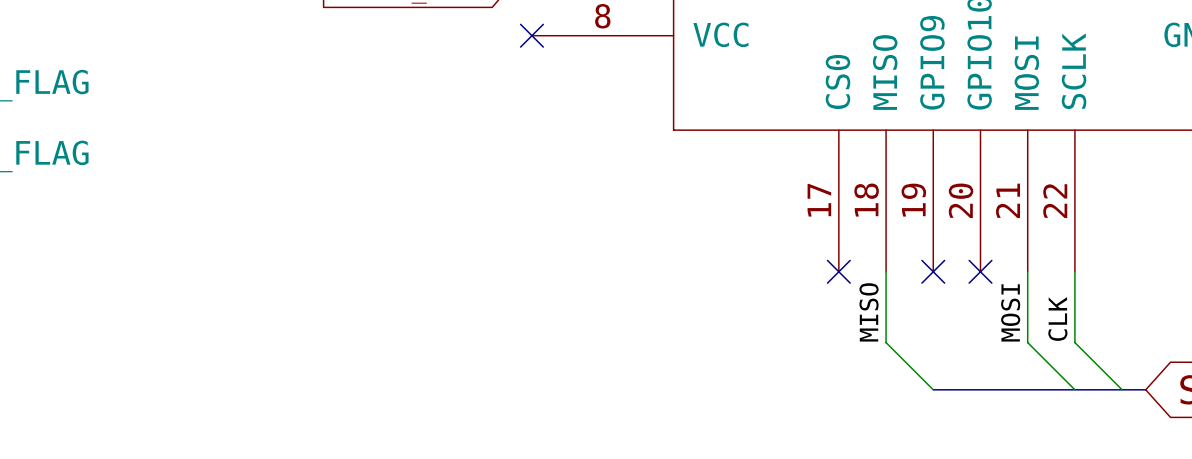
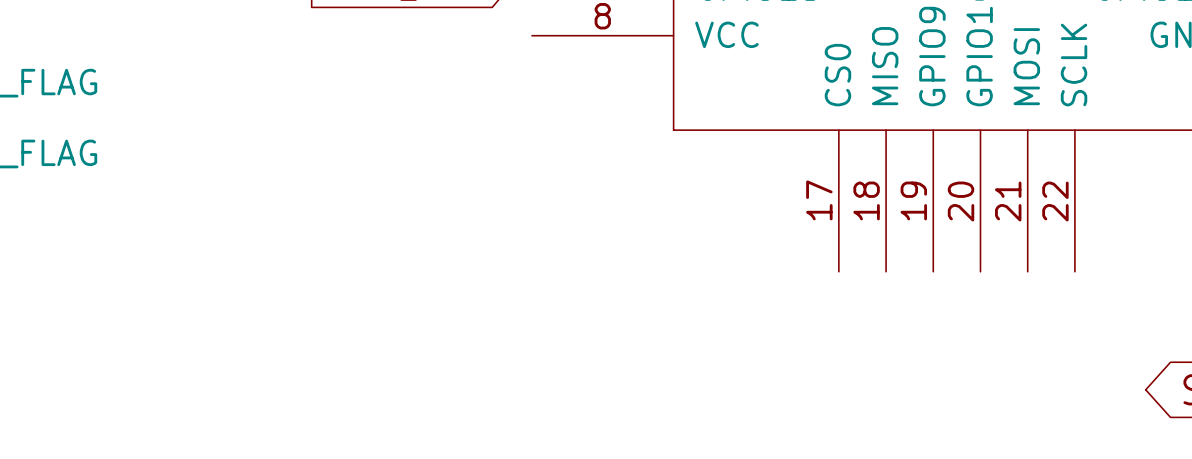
no-connect mark: (531, 35) -> none
no-connect mark: (838, 271) -> none
wire: (886, 271) (886, 342) (933, 389) -> none
no-connect mark: (933, 271) -> none
no-connect mark: (980, 271) -> none
wire: (1027, 271) (1027, 342) (1074, 389) -> none
wire: (1074, 271) (1074, 342) (1122, 389) -> none
label: MISO (869, 312) -> none
label: MOSI (1010, 312) -> none
label: CLK (1057, 318) -> none
bus: (933, 389) (1145, 389) -> none

